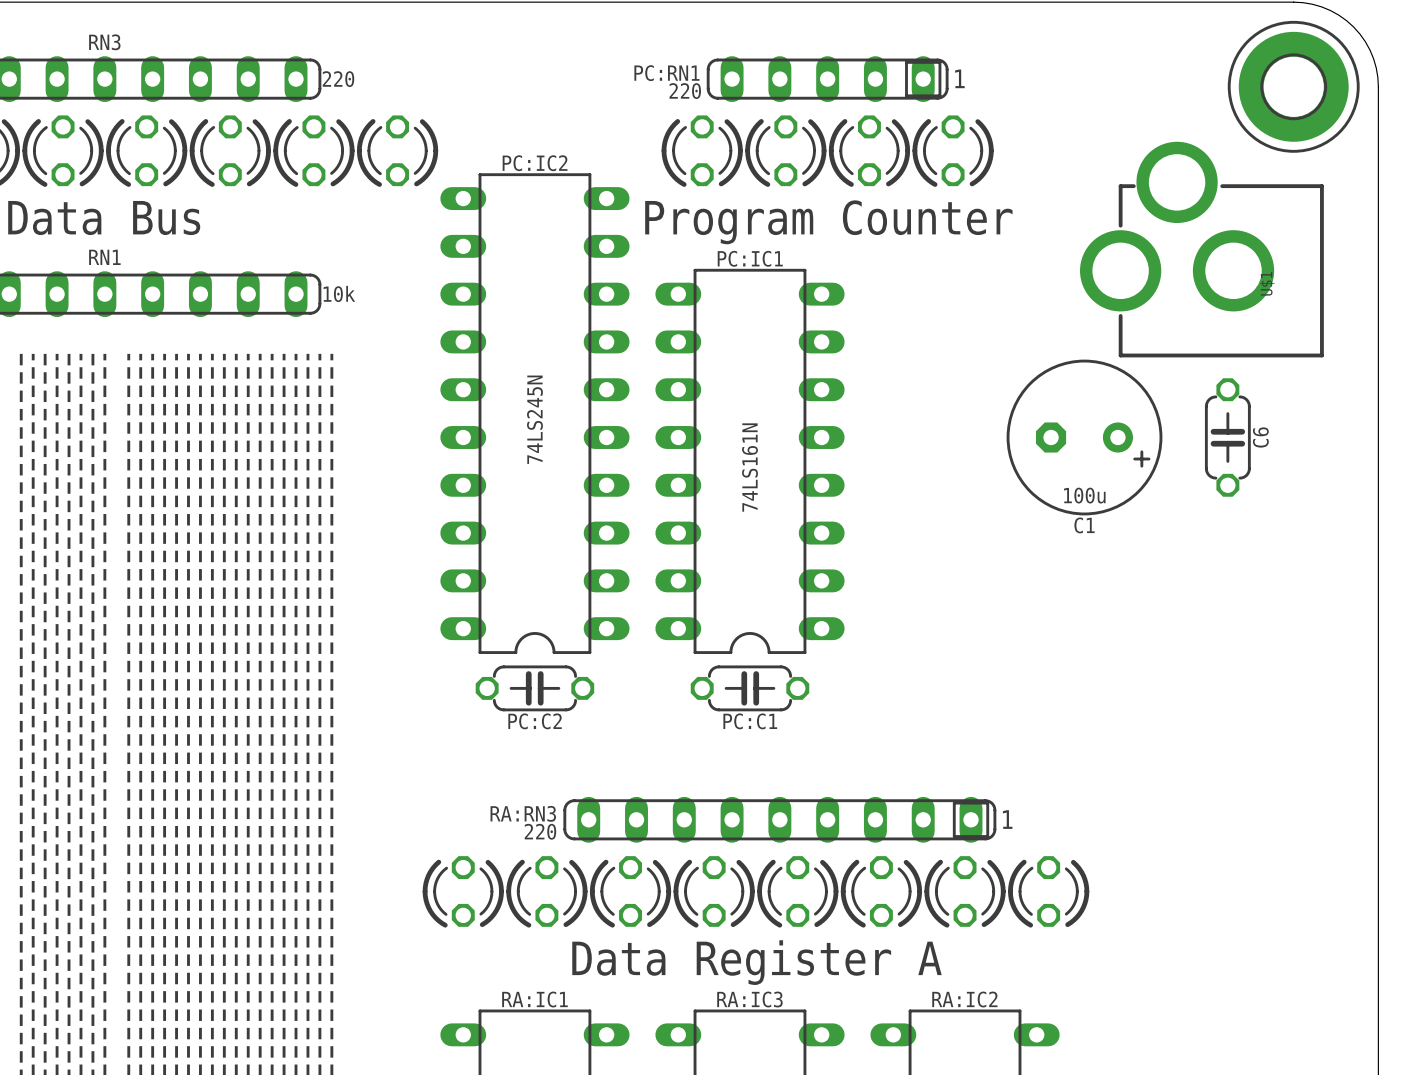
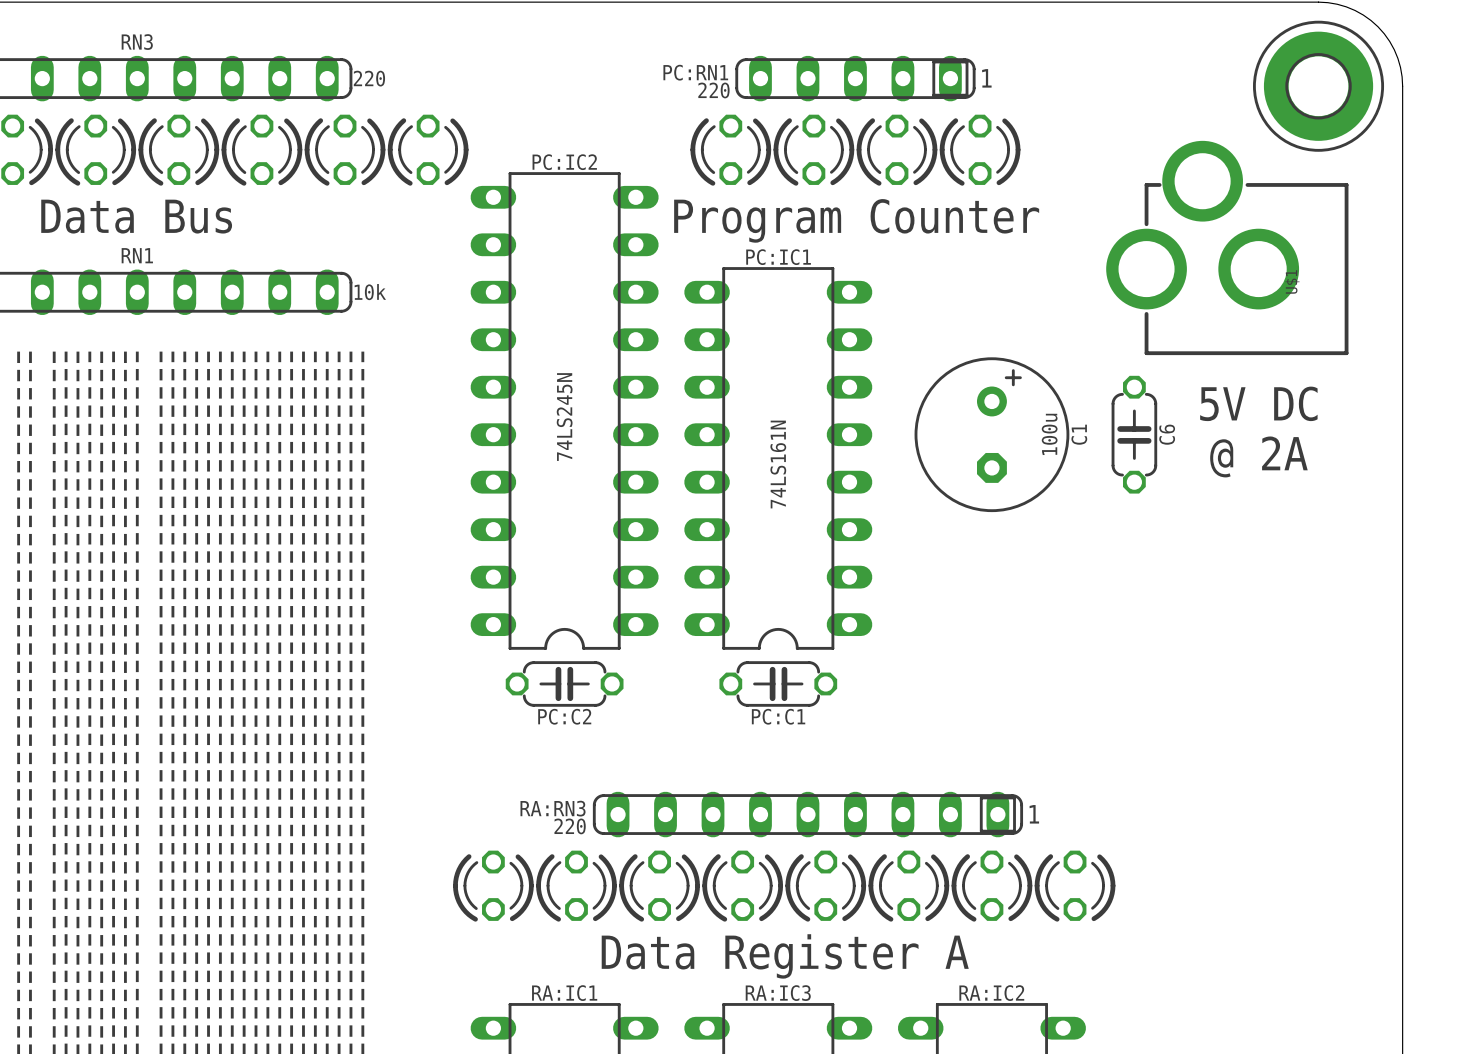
text: none -> 5V DC (1258, 403)
C1 rotation: 0° (1084, 437) -> 90° counterclockwise (991, 434)
C1 position: (1084, 437) -> (991, 434)
C6 position: (1227, 437) -> (1134, 434)
text: none -> @ 2A (1258, 456)

